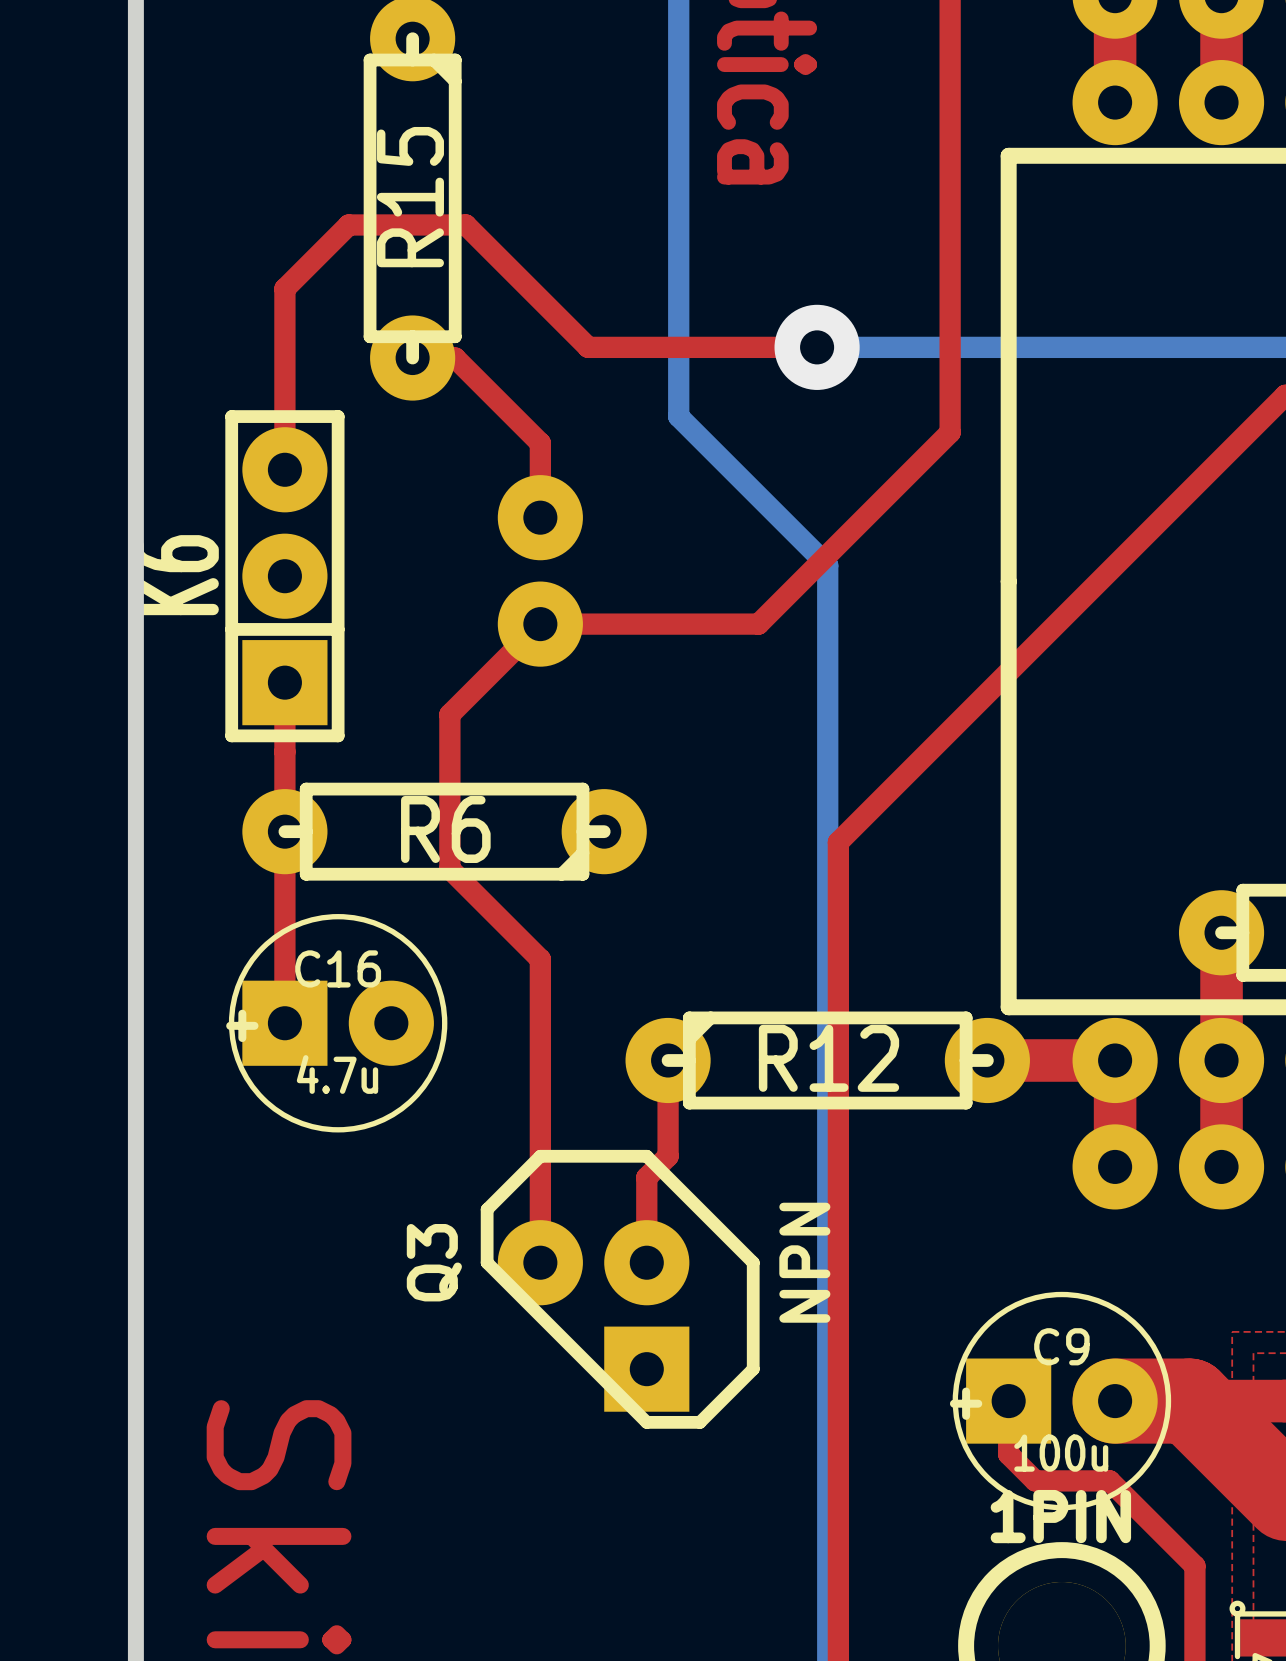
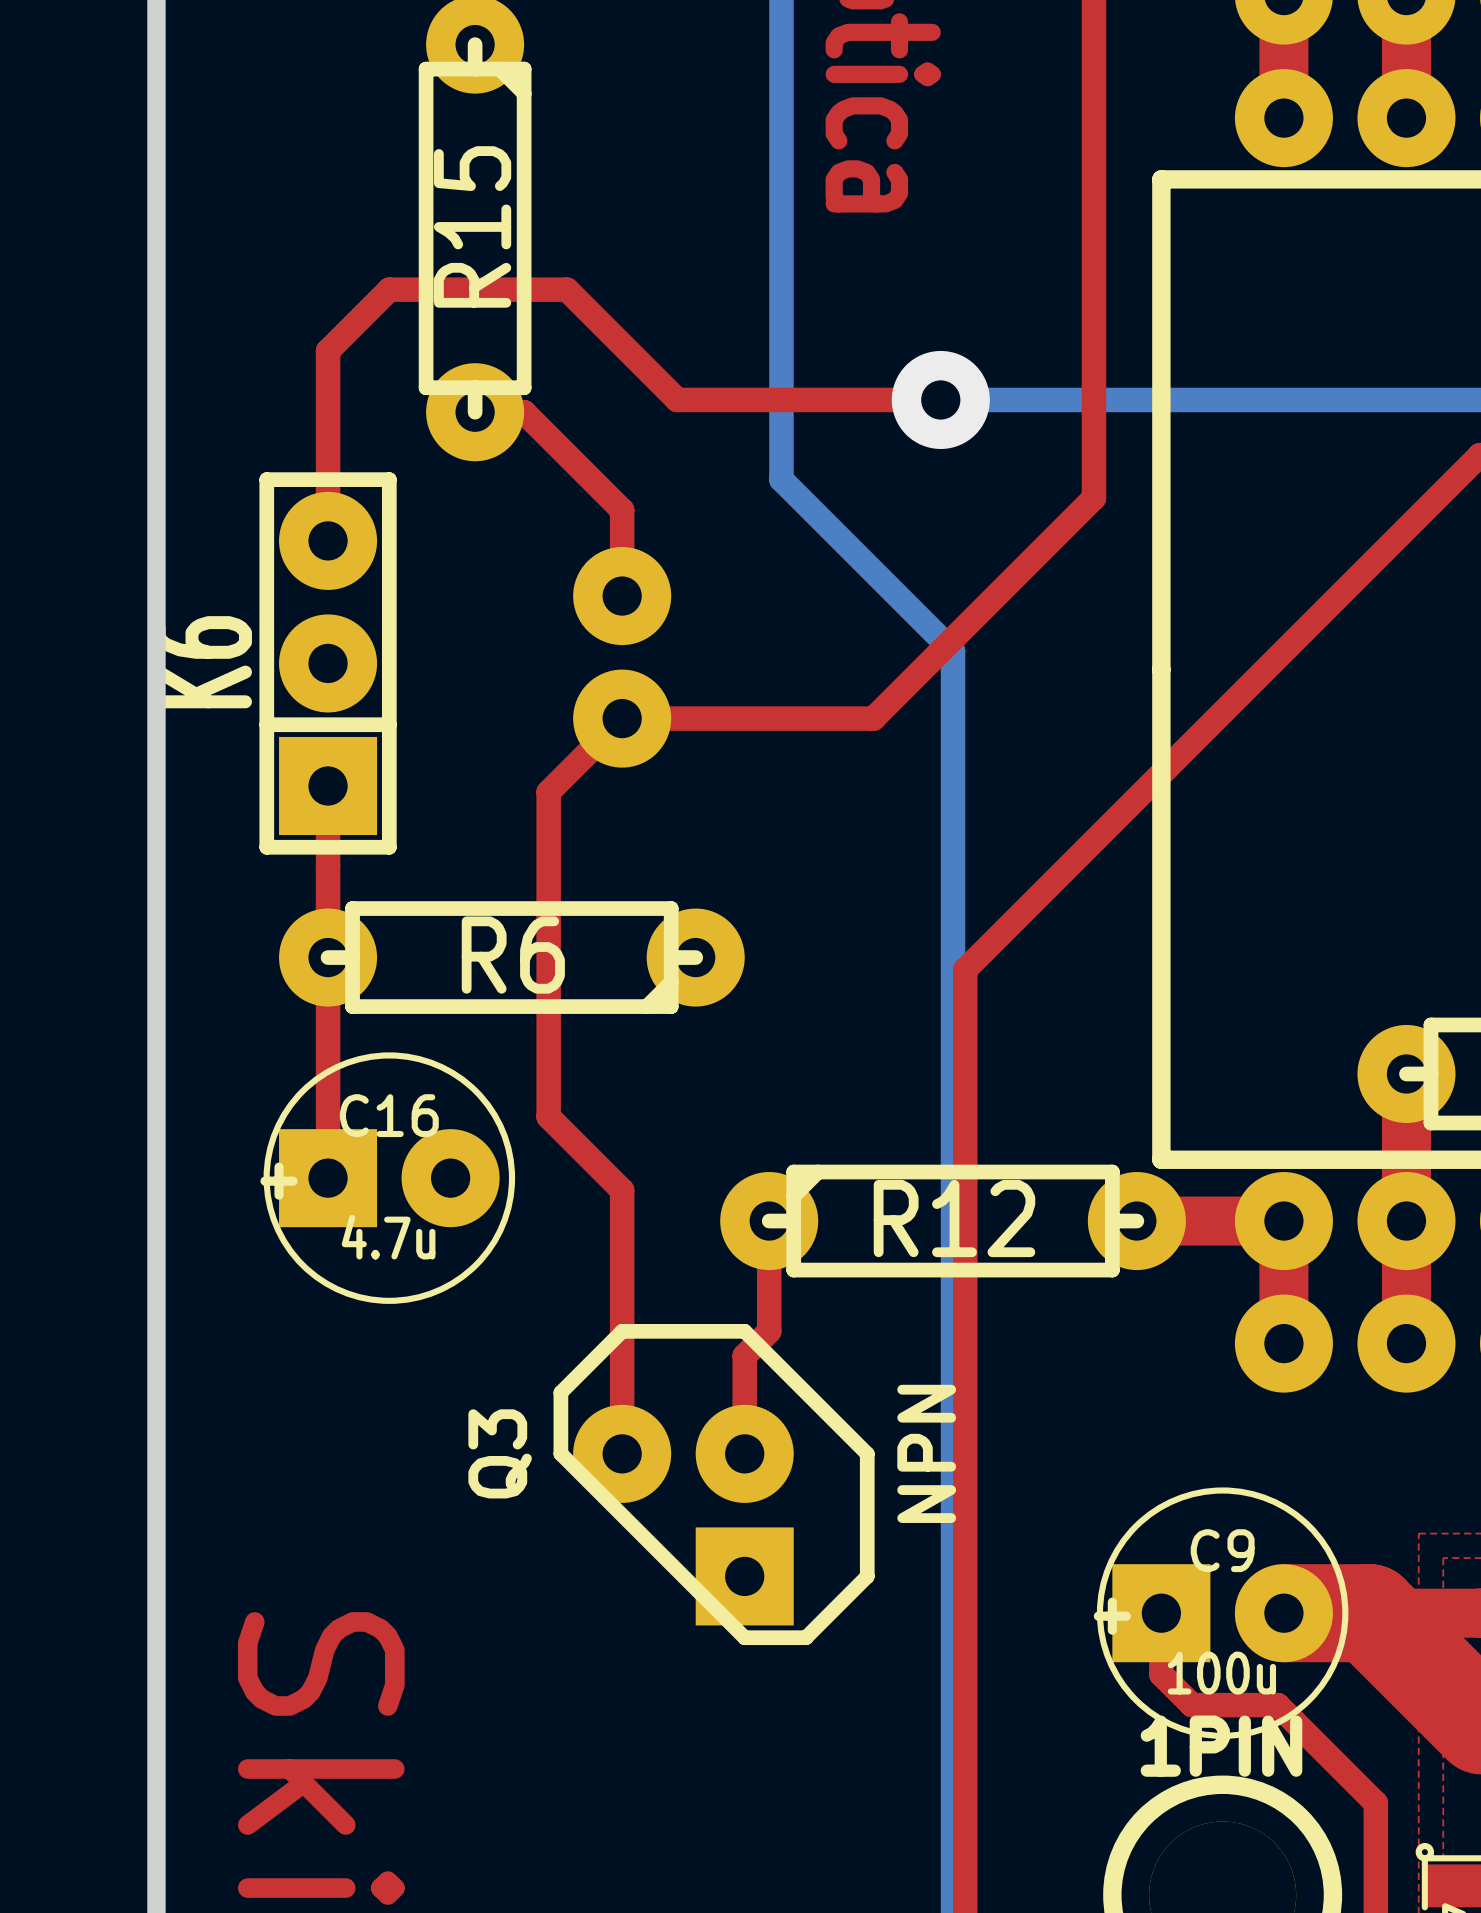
top track: (492, 251) (465, 224) (348, 224) (284, 288) (284, 304) -> (567, 289) (389, 289) (328, 350)
top track: (476, 687) (449, 714) (449, 868) (540, 959) (540, 1033) -> (548, 792) (548, 1116) (622, 1190)

